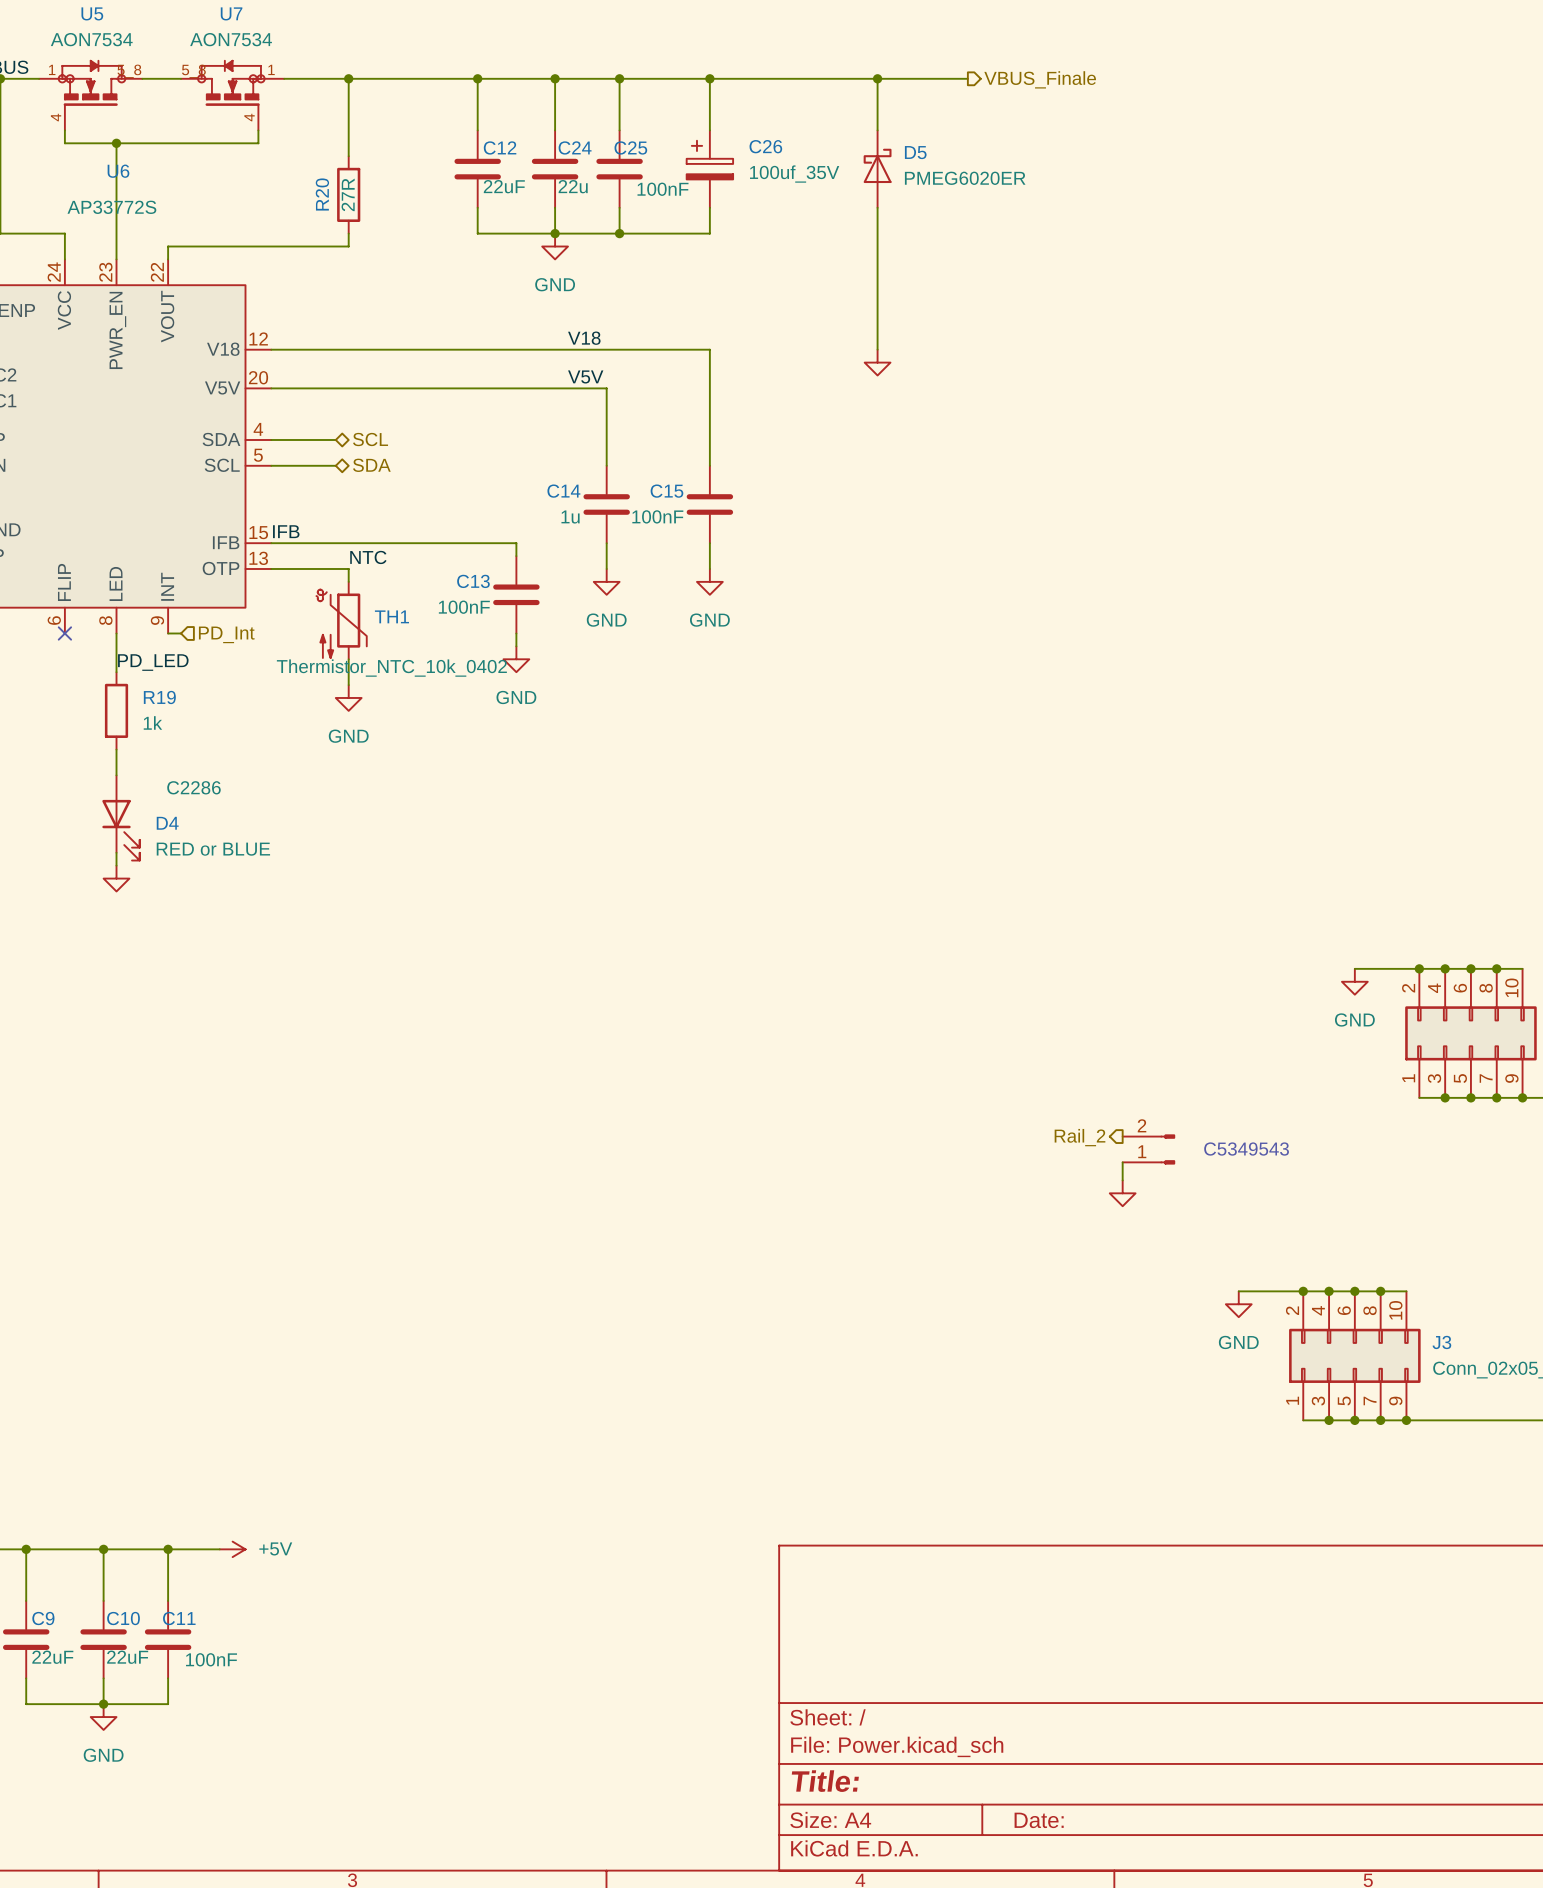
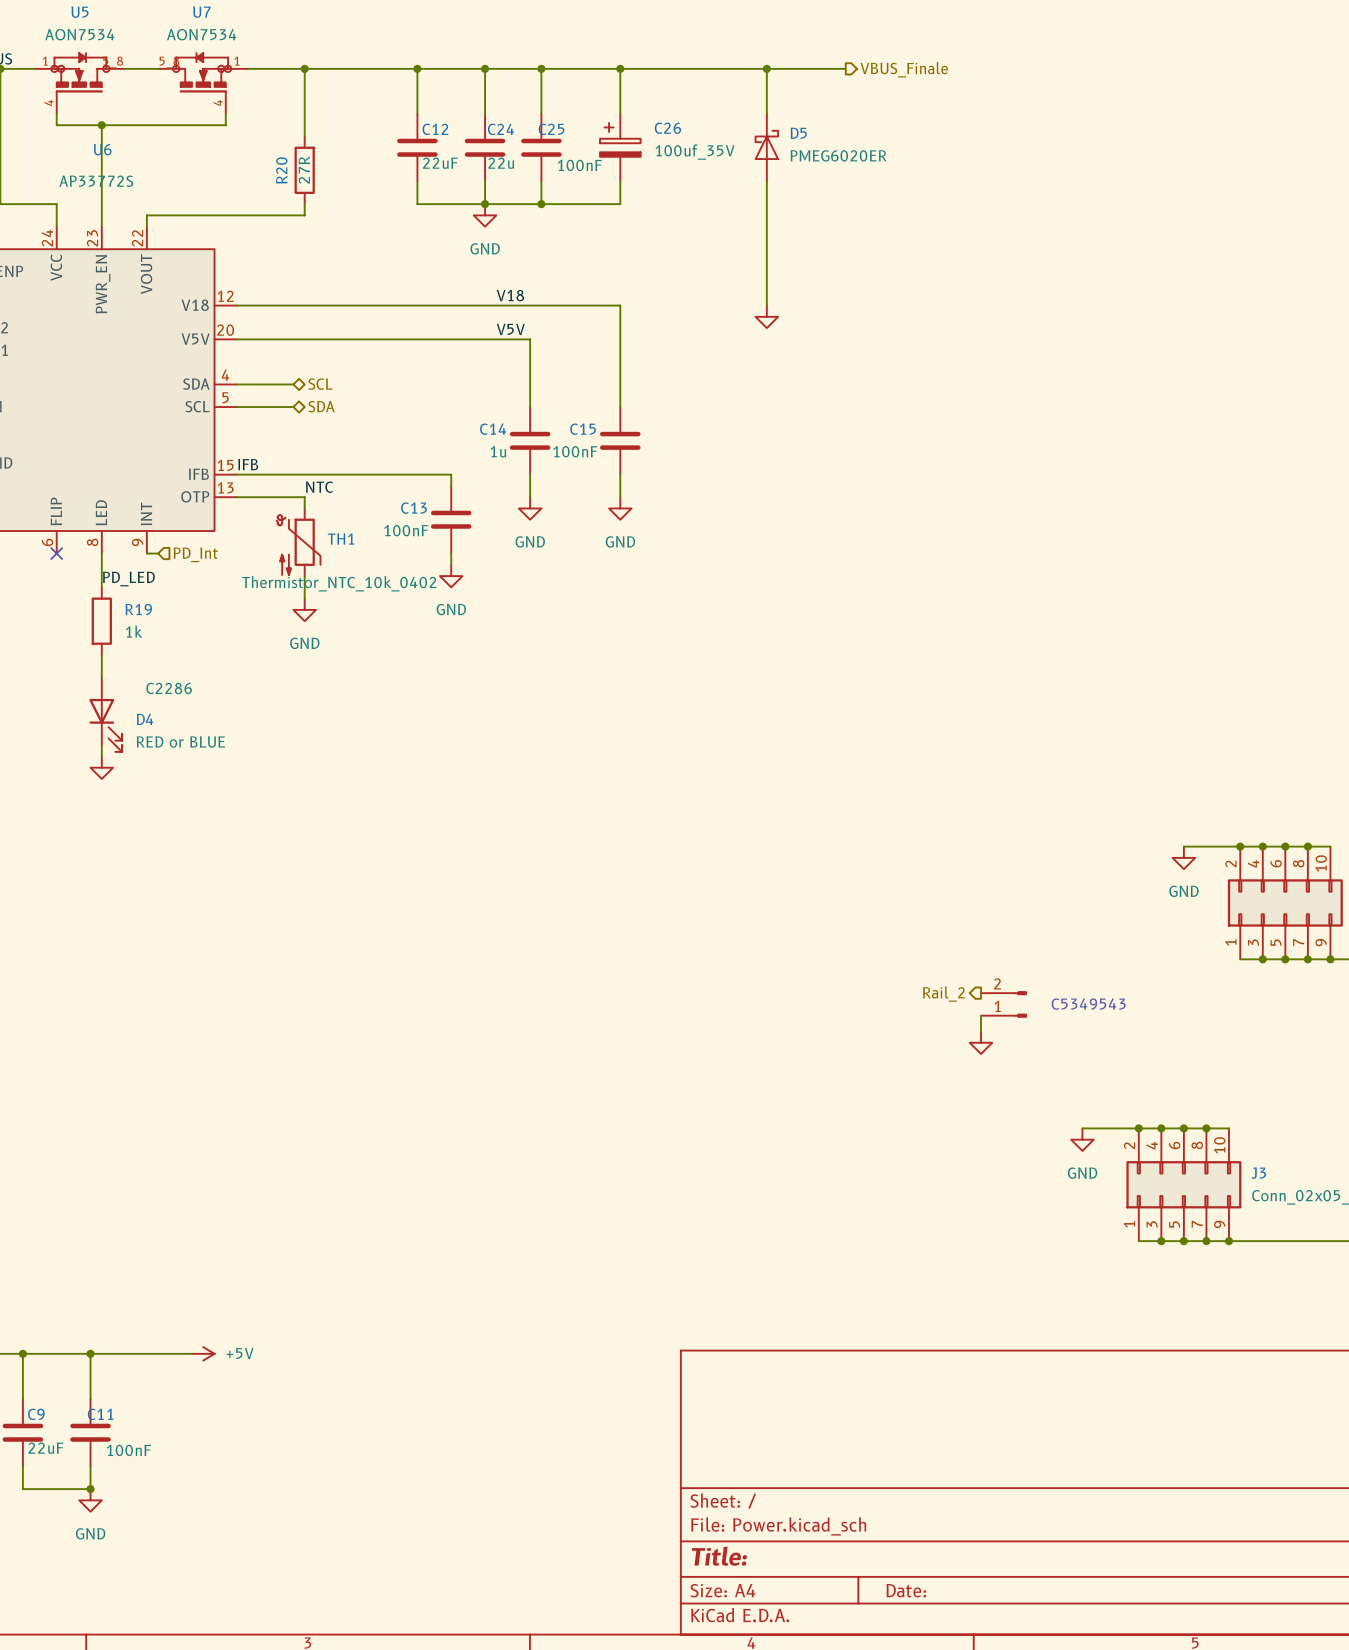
wire: (168, 1549) (168, 1600) -> none
junction: (168, 1549) -> none
C10 name: C10 (123, 1618) -> C11 (100, 1414)
C11: 100nF (168, 1639) -> none
C10 value: 22uF (127, 1657) -> 100nF (128, 1450)
wire: (168, 1678) (168, 1704) (103, 1704) -> none

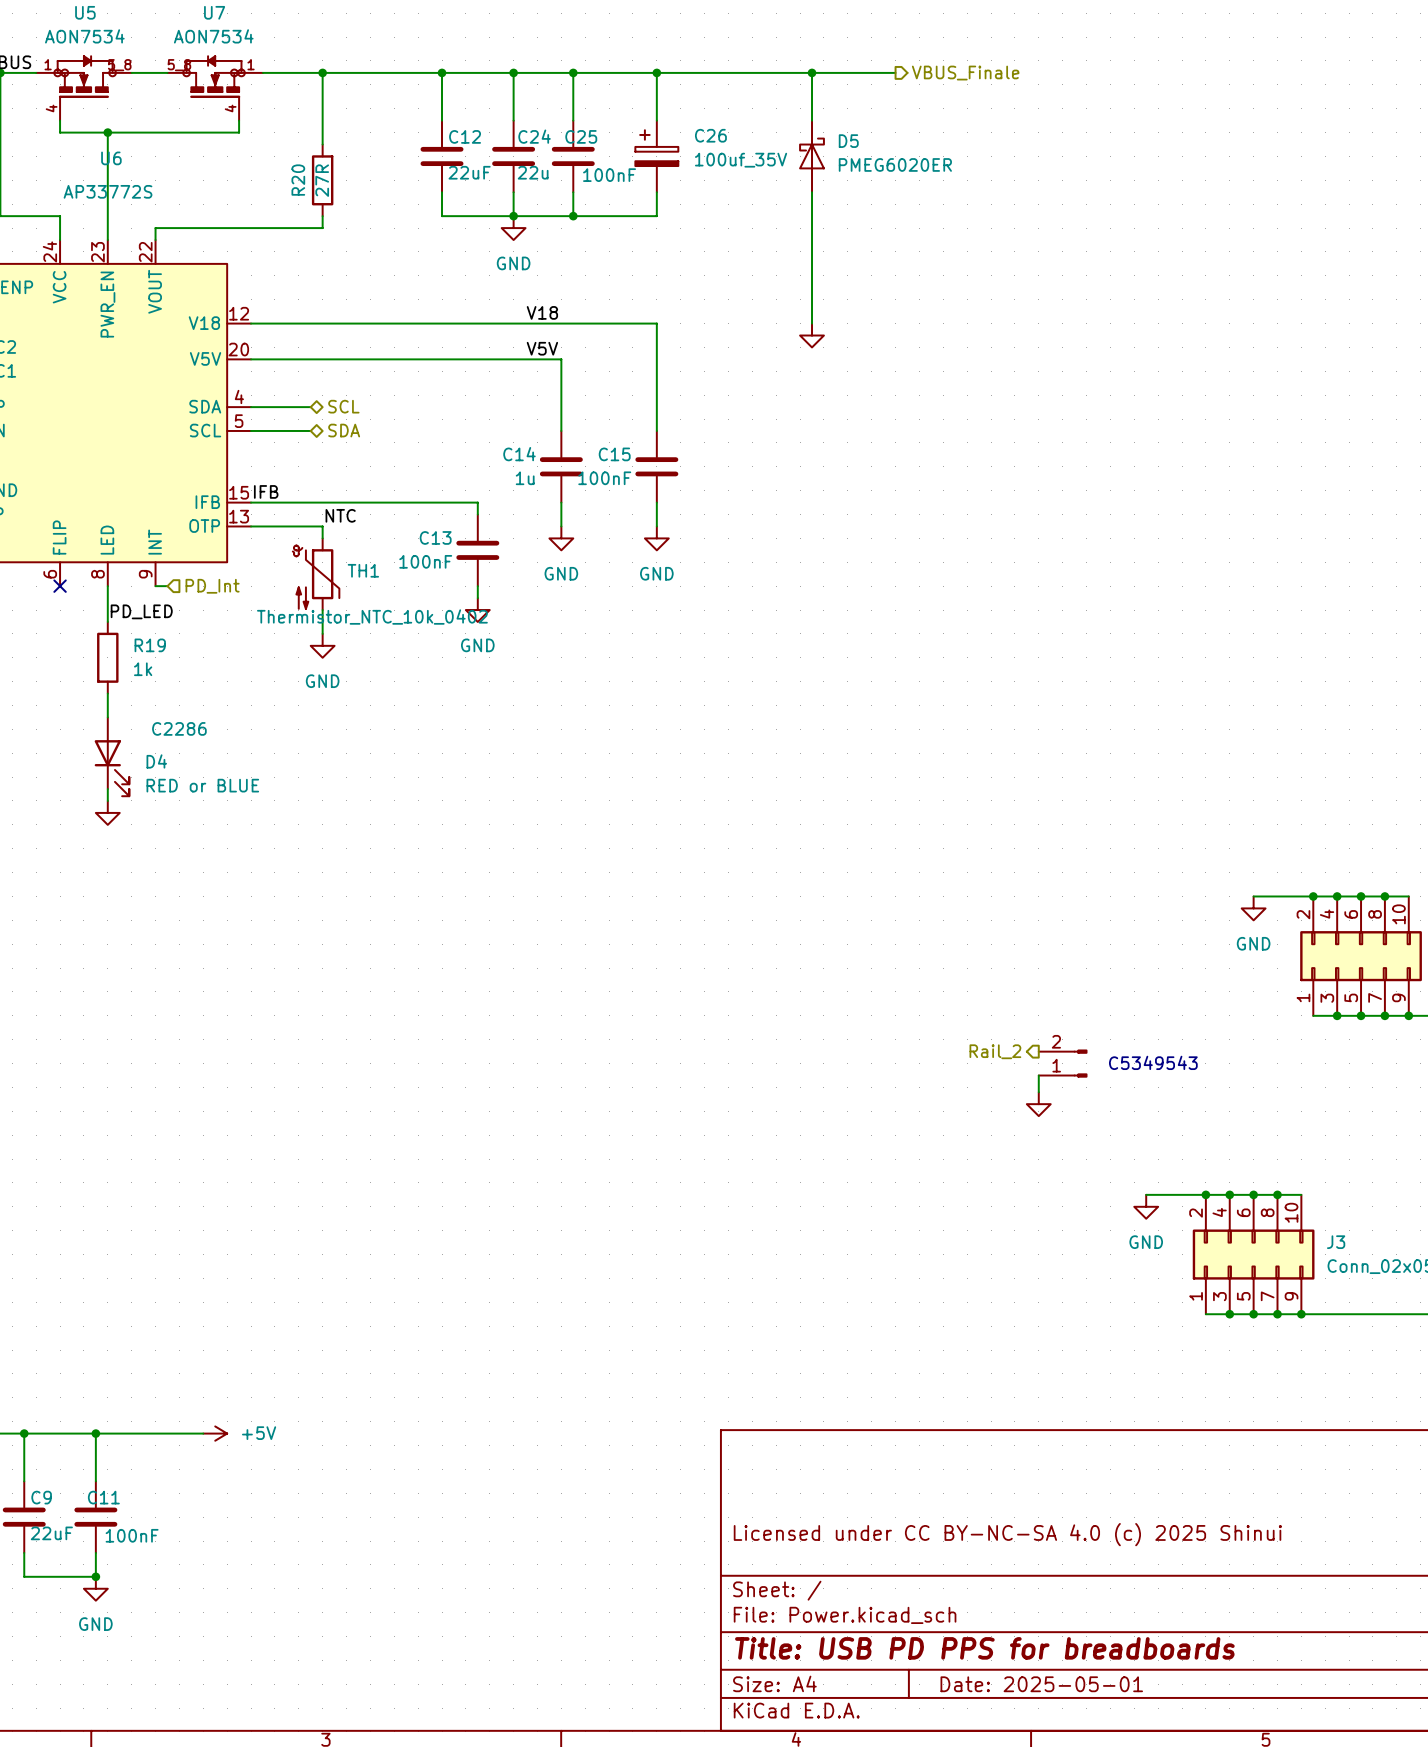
title block: none -> Licensed under CC BY-NC-SA 4.0 (c) 2025 Shinui (1007, 1534)
title block: Title: (719, 1556) -> Title: USB PD PPS for breadboards (984, 1648)
title block: Date: (906, 1590) -> Date: 2025-05-01 (1041, 1684)

